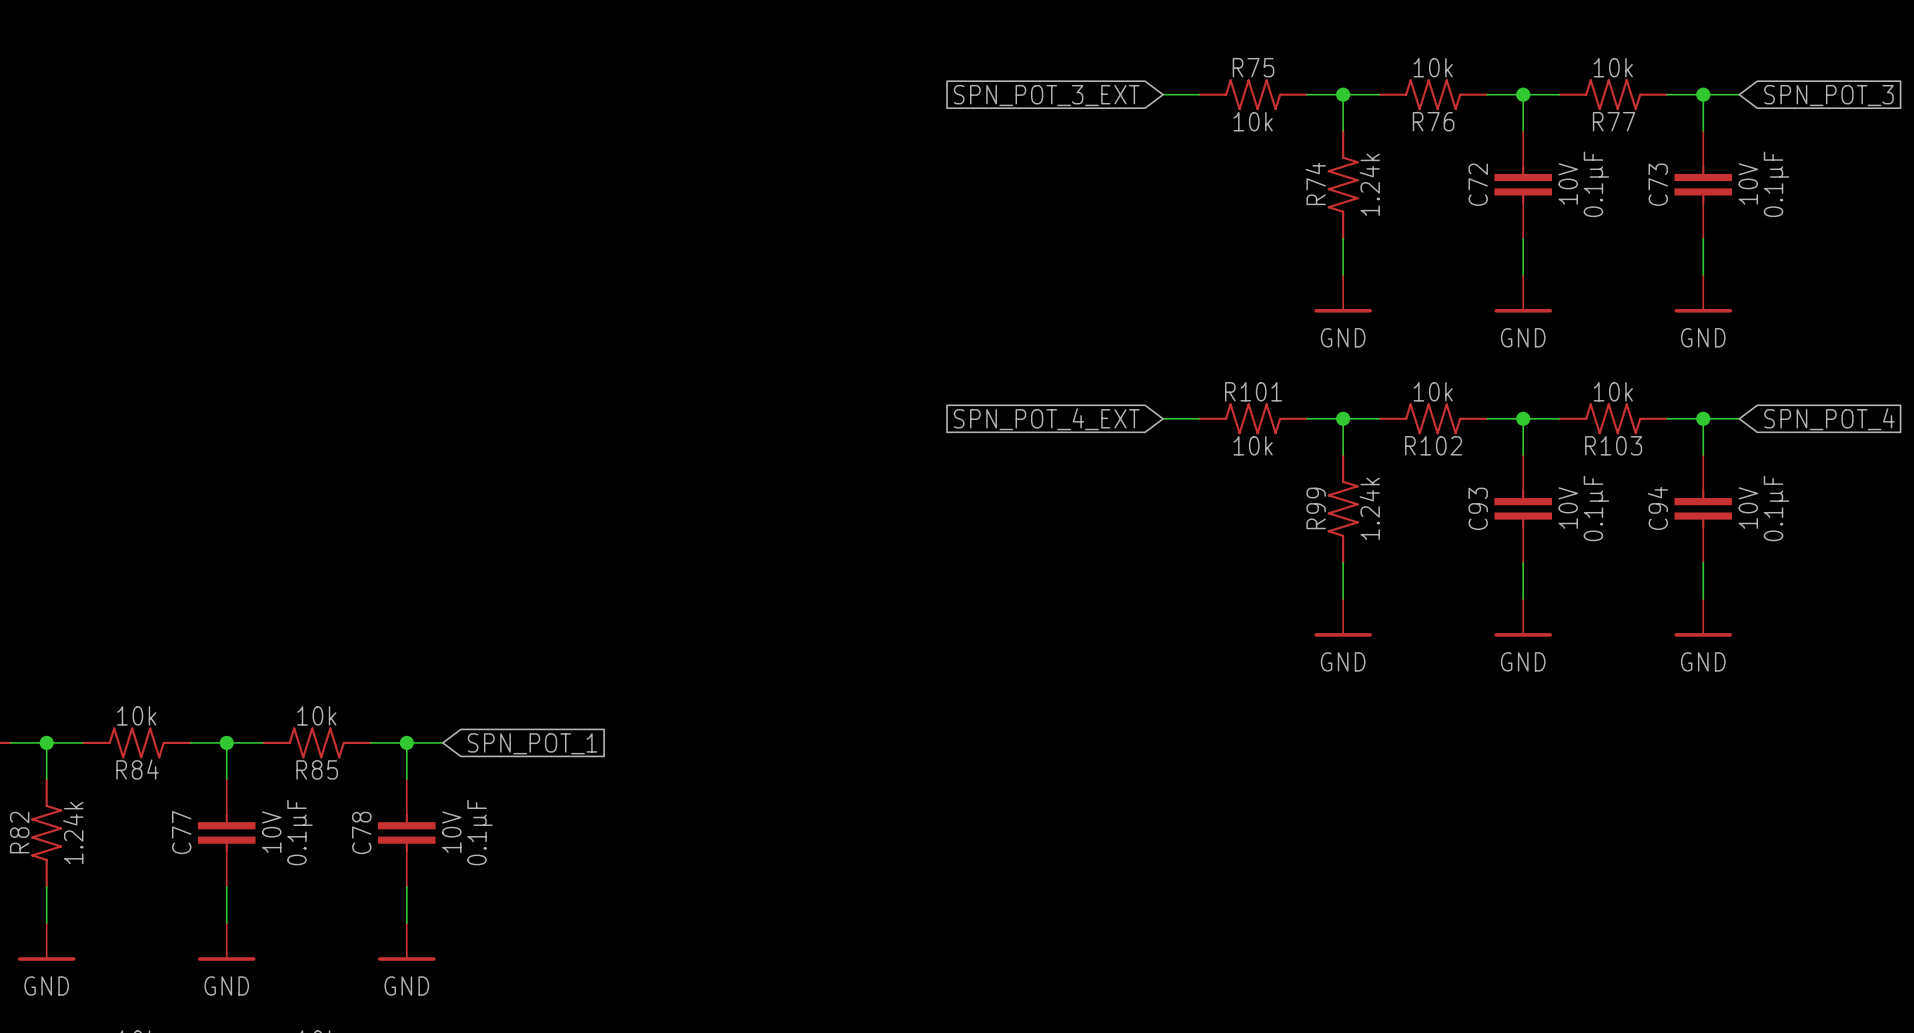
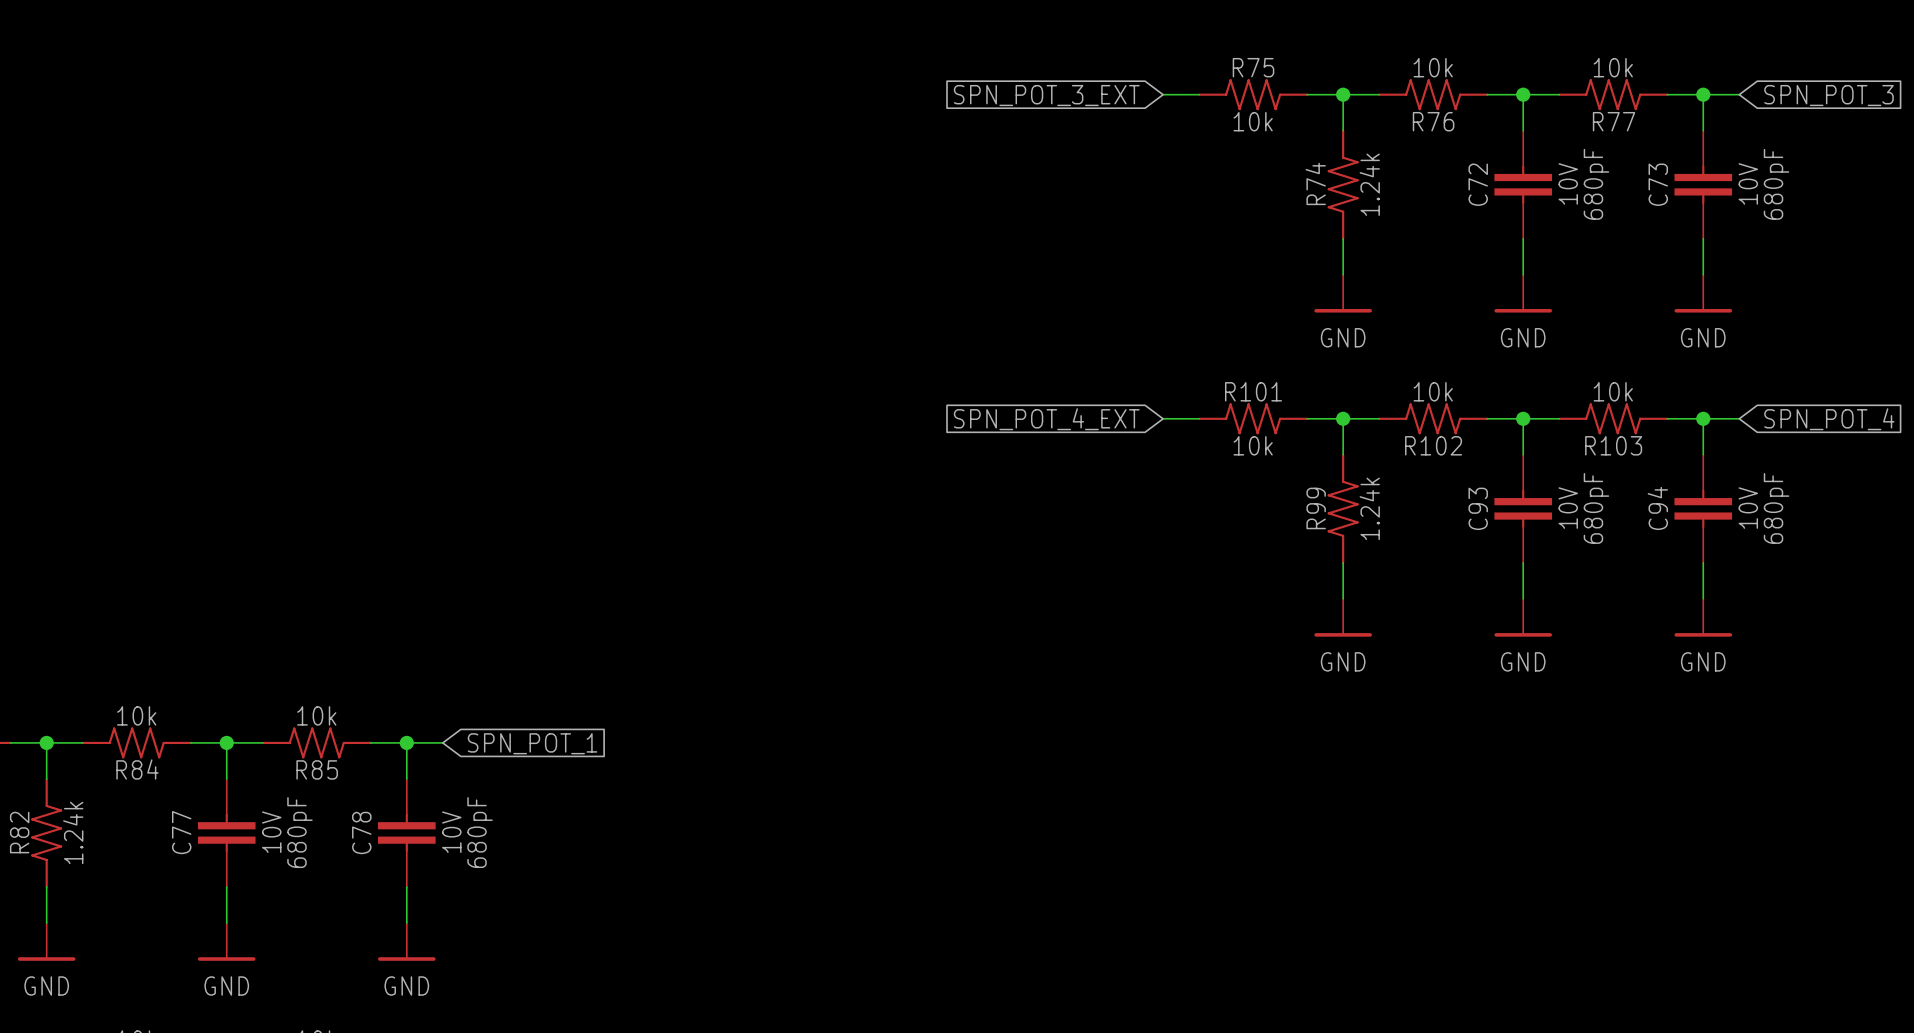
C72 text: 0.1µF (1596, 184) -> 680pF (1596, 184)
C73 text: 0.1µF (1776, 184) -> 680pF (1776, 184)
C93 text: 0.1µF (1596, 508) -> 680pF (1596, 508)
C94 text: 0.1µF (1776, 508) -> 680pF (1776, 508)
C77 text: 0.1µF (299, 832) -> 680pF (299, 832)
C78 text: 0.1µF (480, 832) -> 680pF (480, 832)

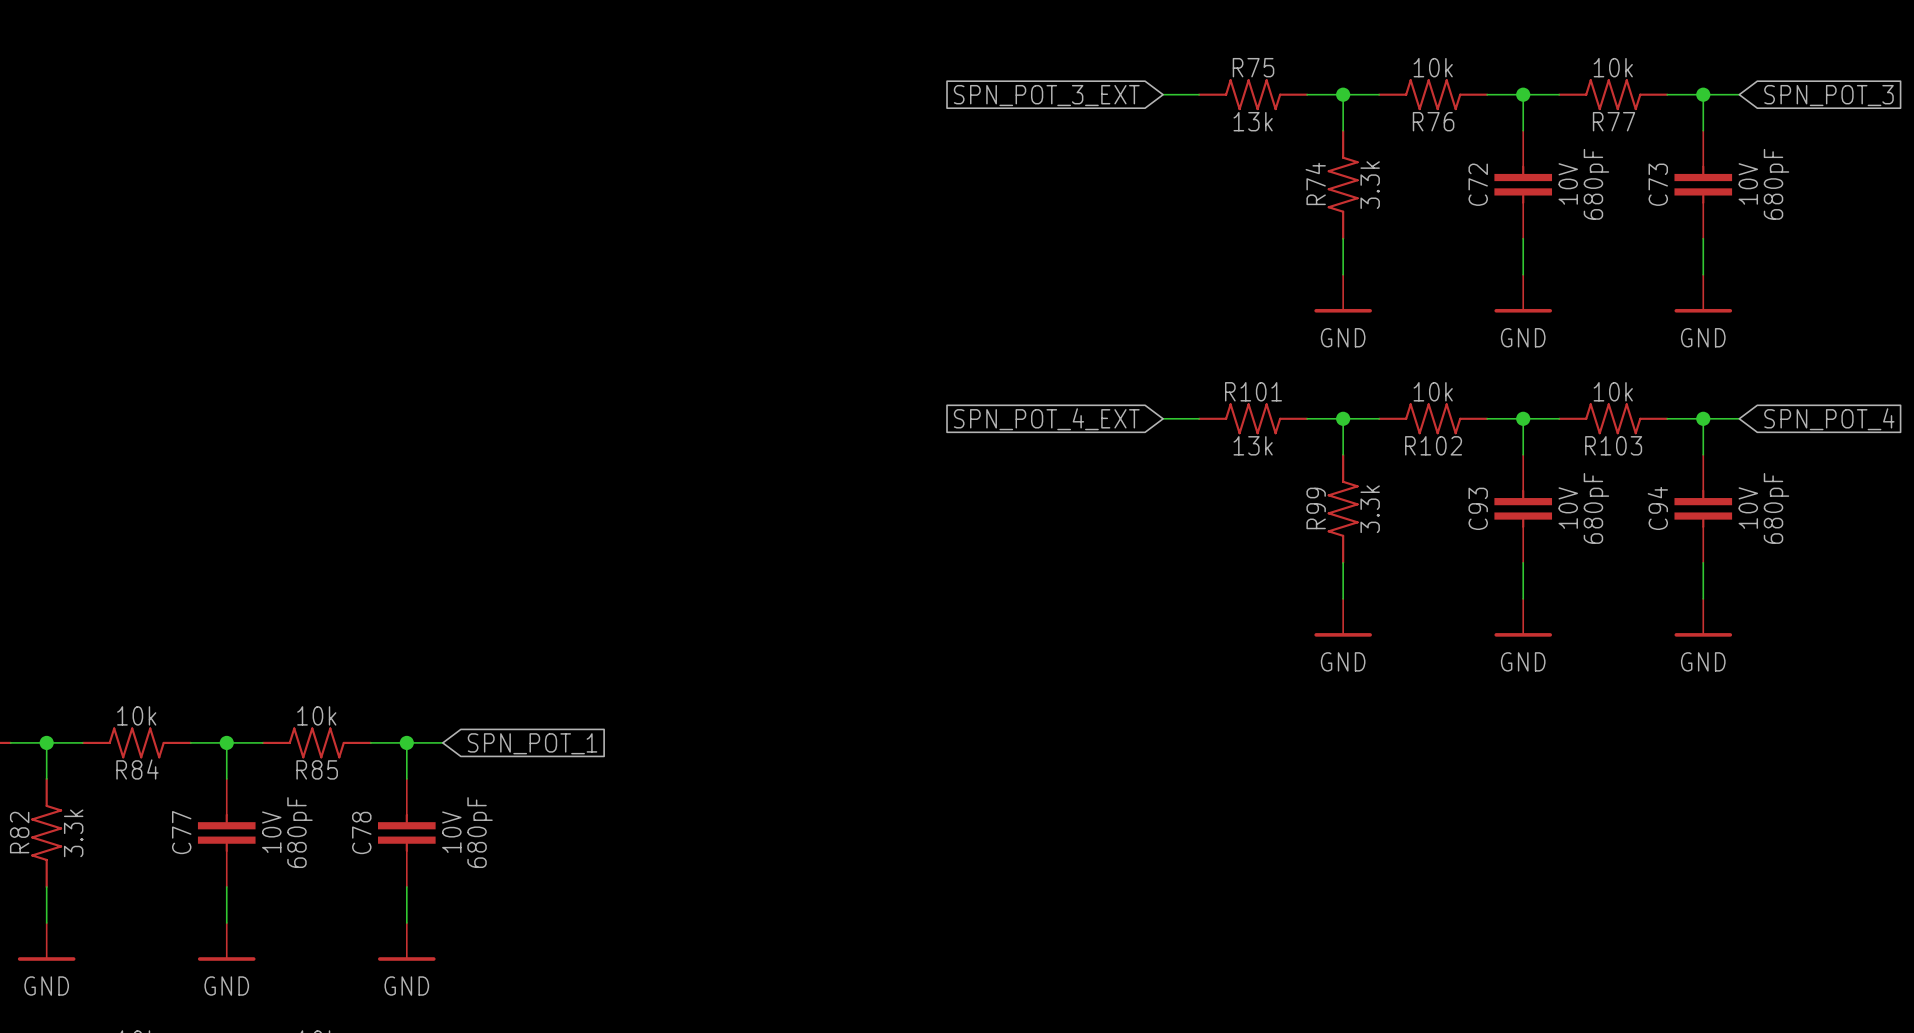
R75 text: 10k (1253, 121) -> 13k (1253, 121)
R74 text: 1.24k (1369, 184) -> 3.3k (1370, 185)
R101 text: 10k (1253, 445) -> 13k (1253, 445)
R99 text: 1.24k (1369, 508) -> 3.3k (1370, 509)
R82 text: 1.24k (73, 832) -> 3.3k (73, 833)

